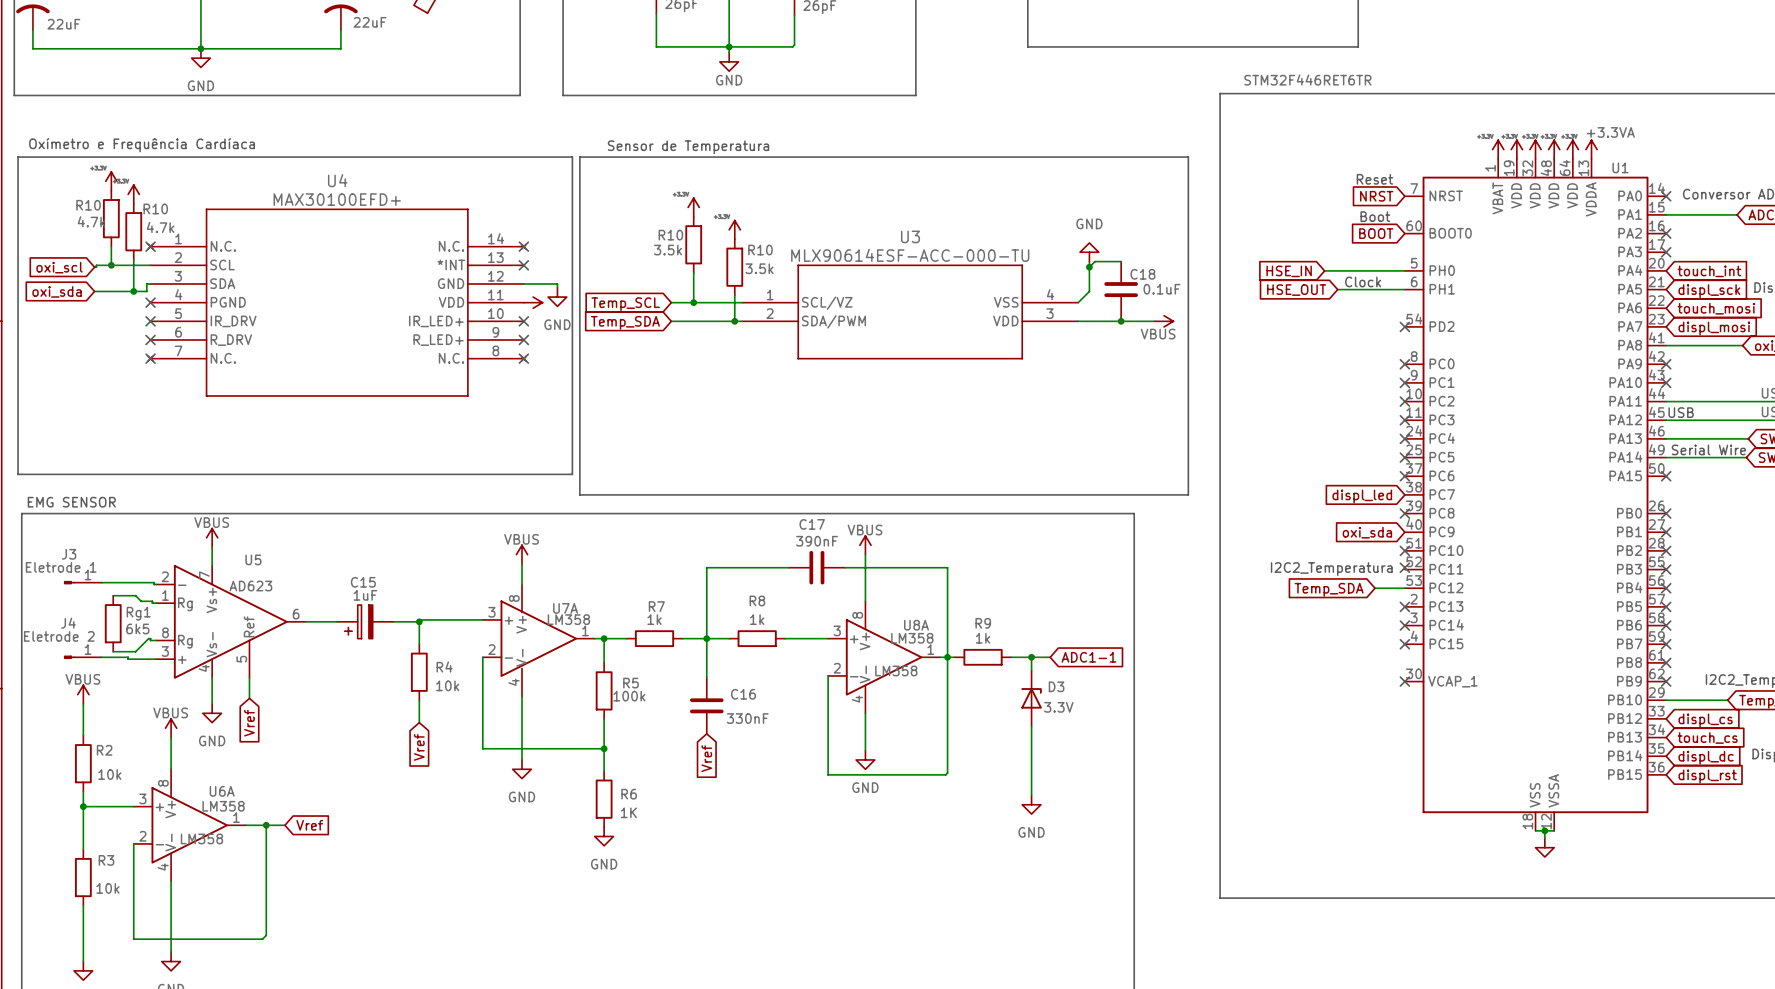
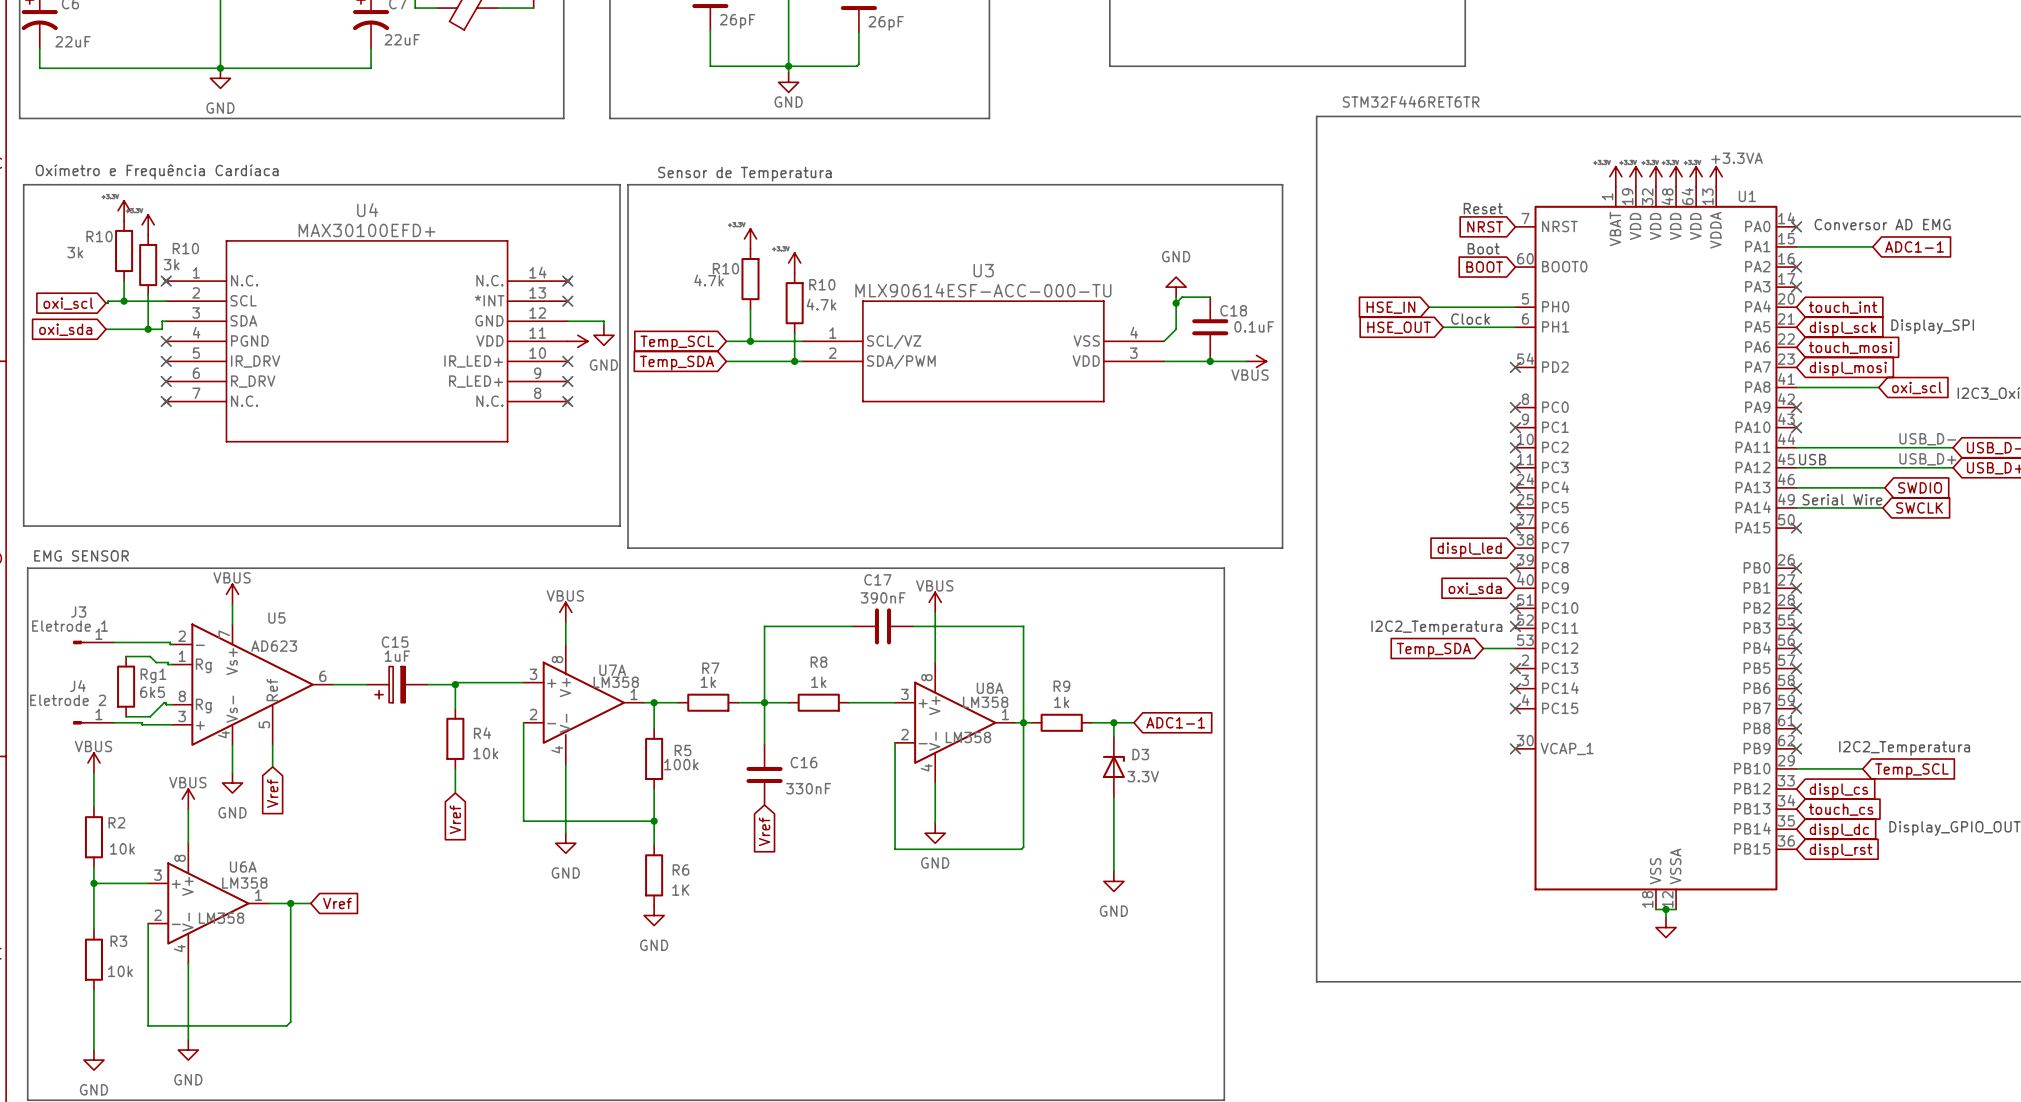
R10 name position: R10 (155, 208) -> R10 (185, 248)
R10 value: 4.7k (91, 221) -> 3k (75, 252)
R10 value: 4.7k (160, 227) -> 3k (171, 264)
R10 value: 3.5k (668, 250) -> 4.7k (709, 280)
R10 value: 3.5k (759, 268) -> 4.7k (821, 304)

